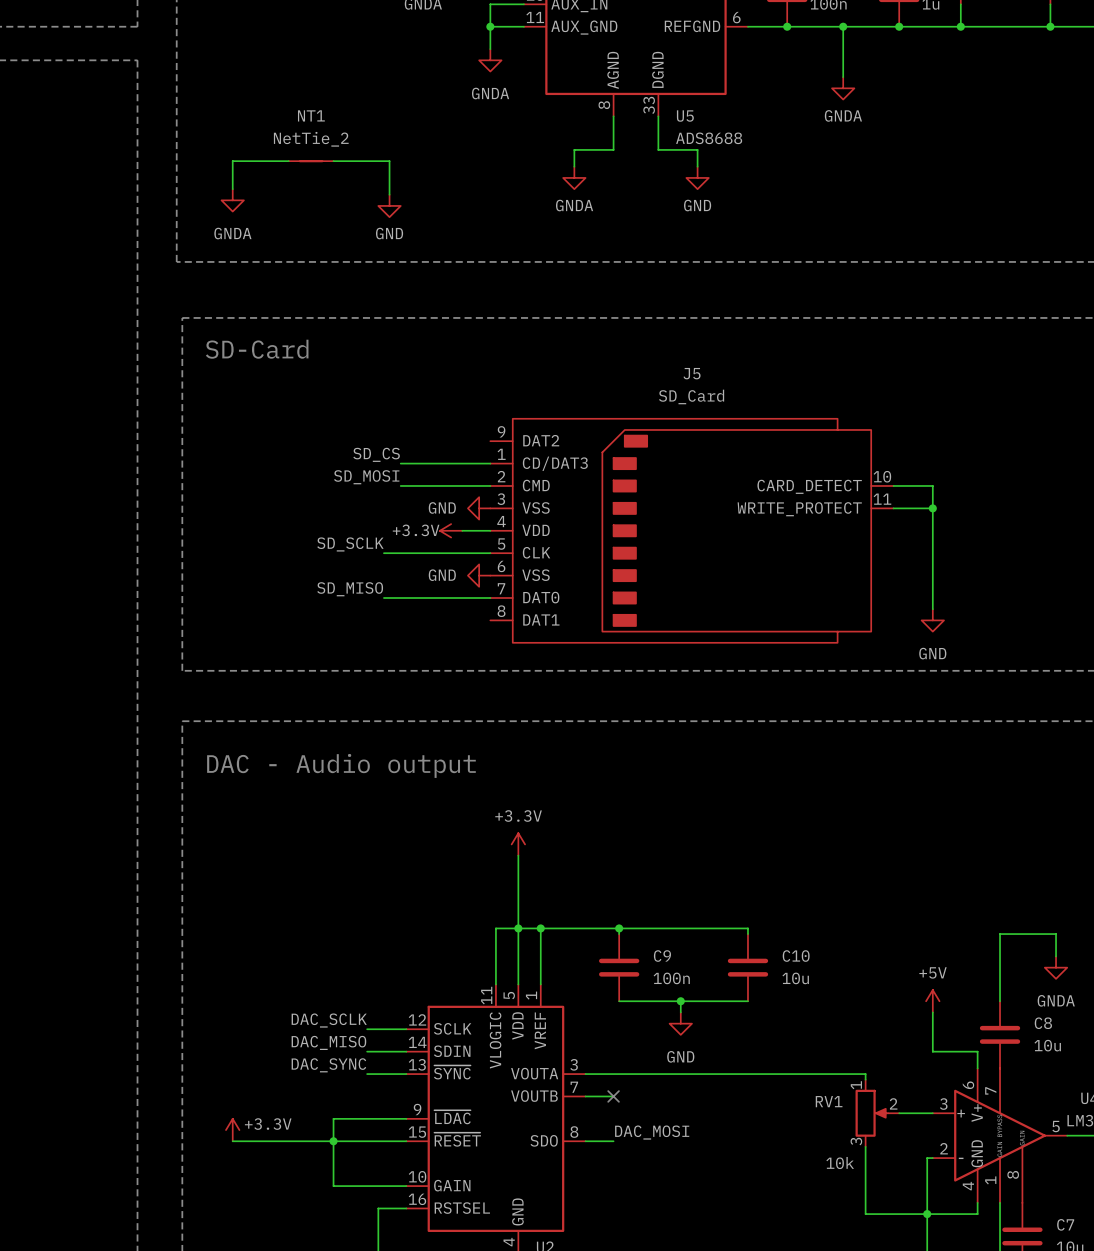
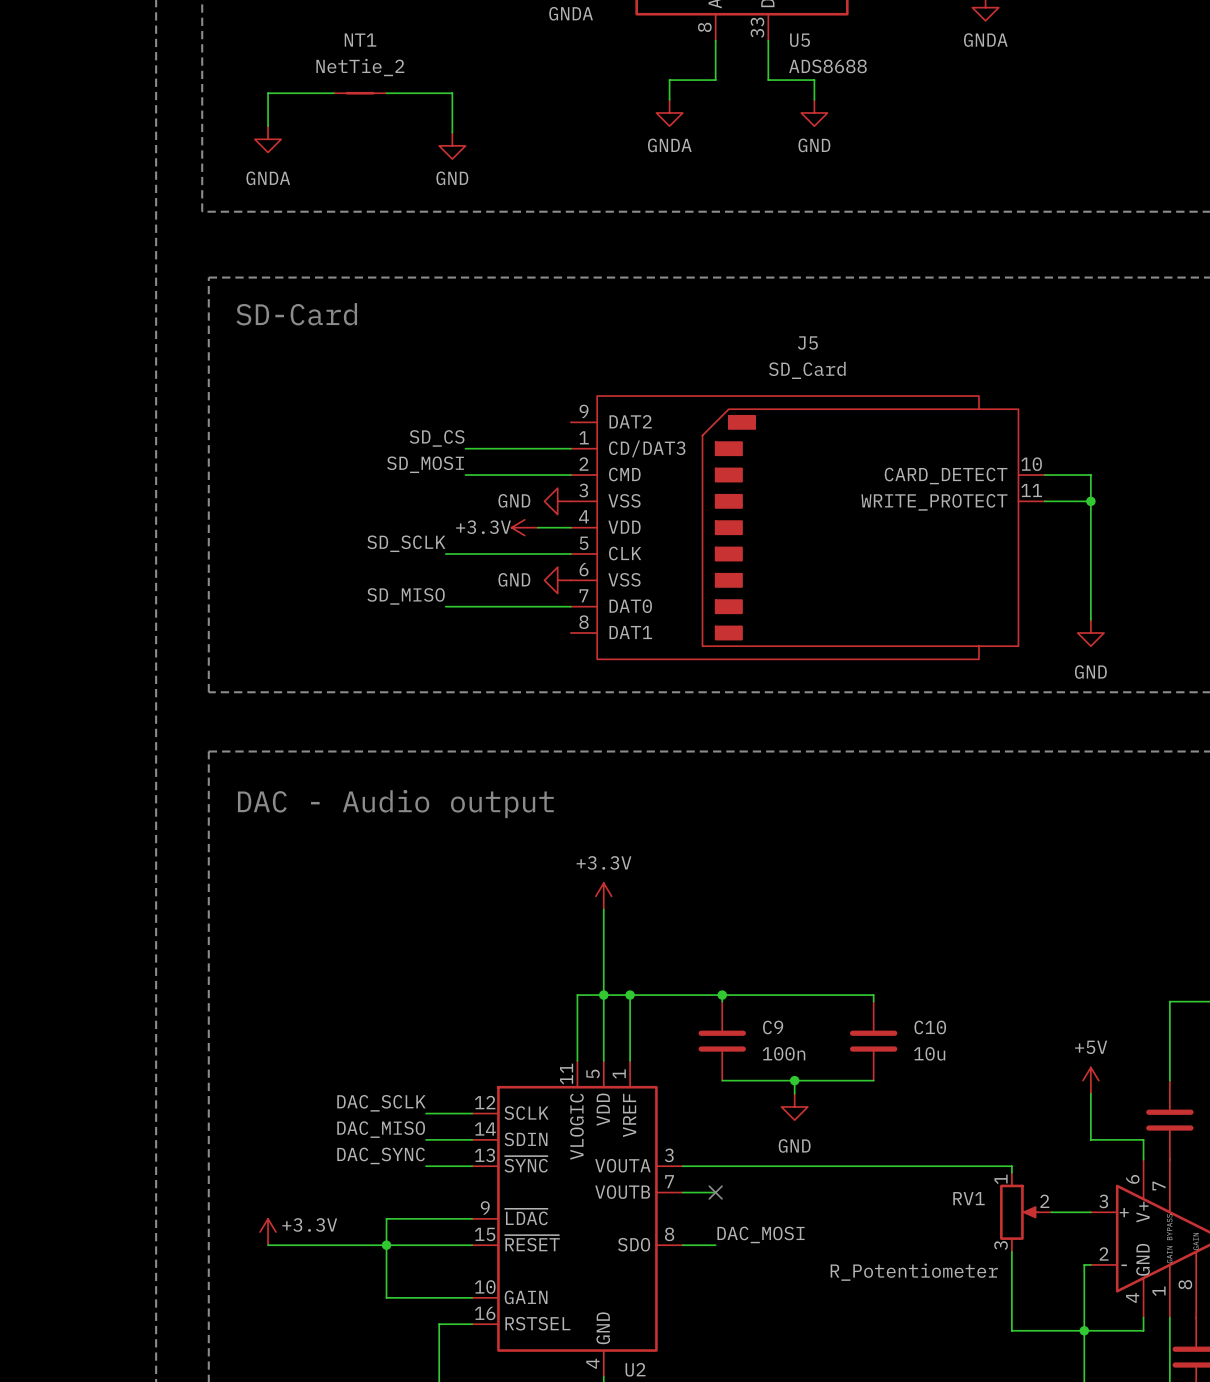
RV1 value: 10k (840, 1163) -> R_Potentiometer (914, 1272)

